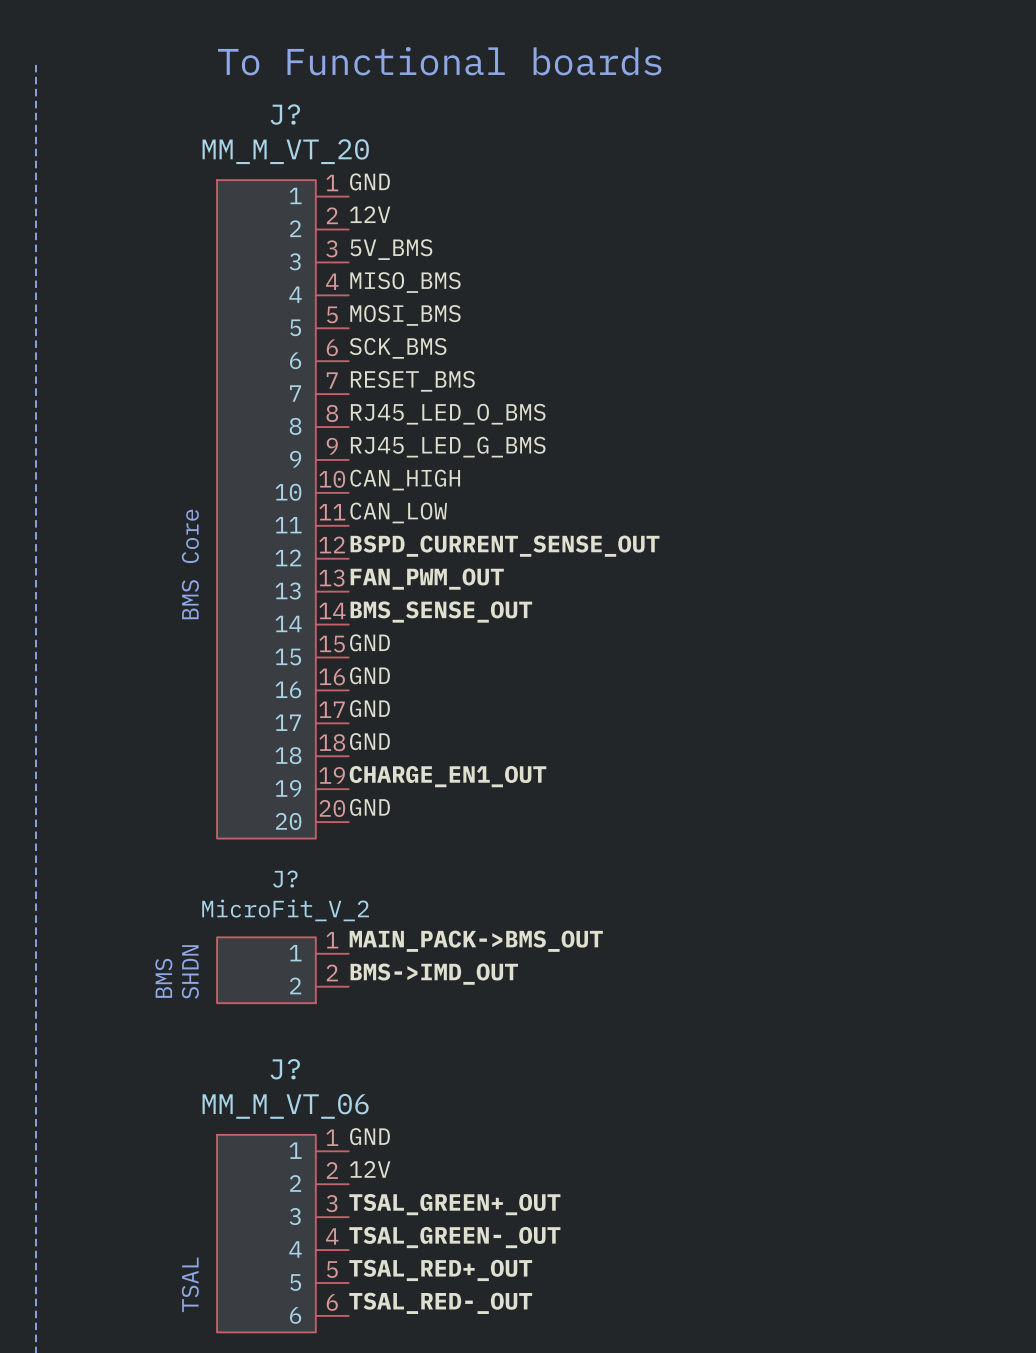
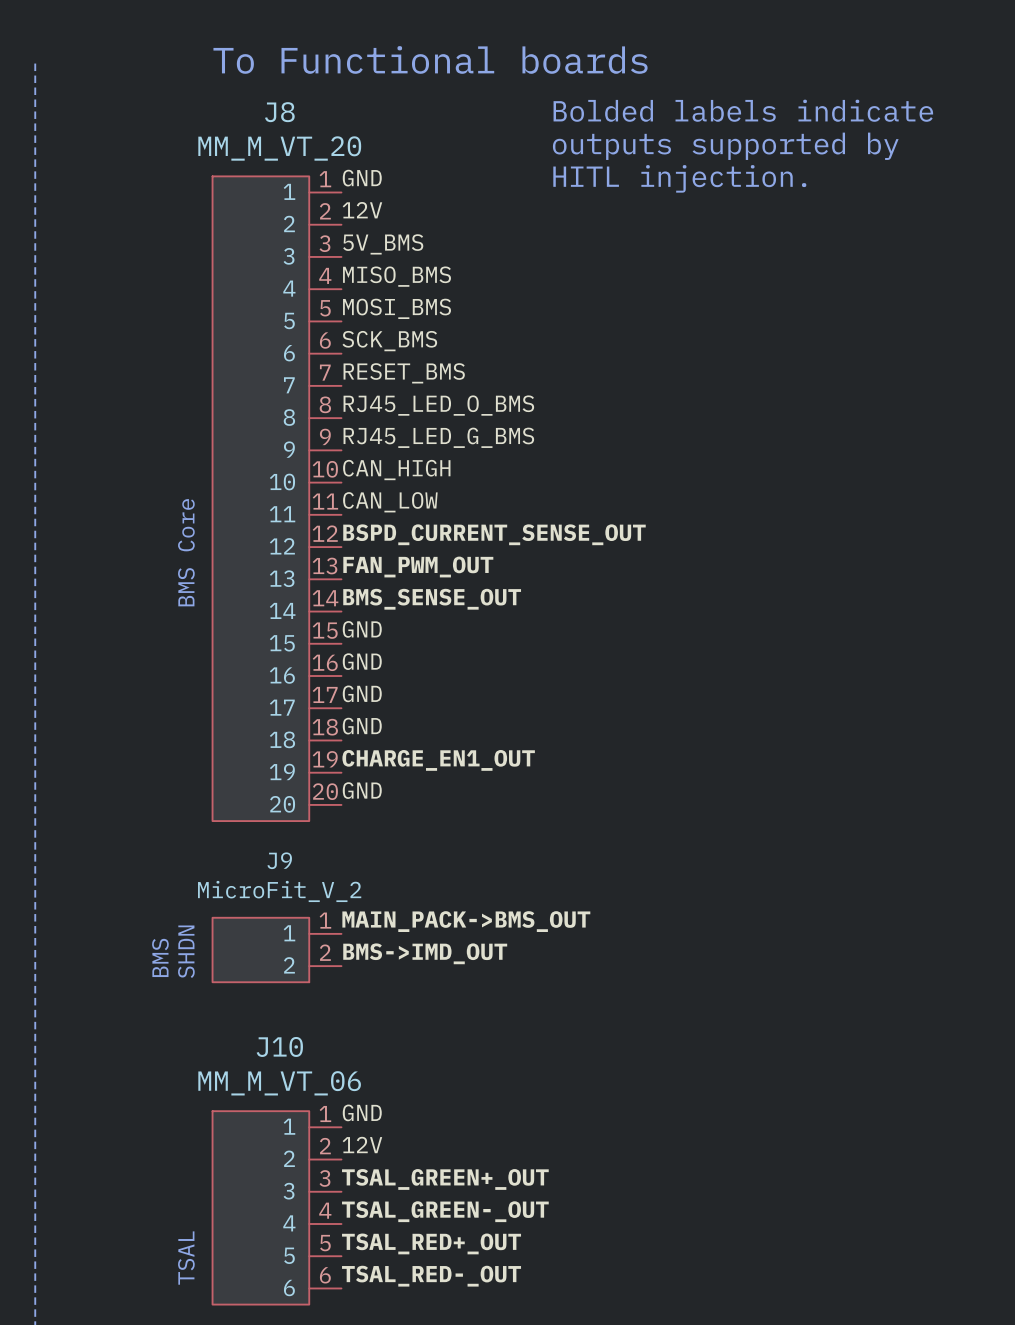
text: none -> Bolded labels indicate (743, 110)
J? name: J? (285, 114) -> J8 (279, 112)
text: none -> outputs supported by (725, 146)
text: none -> HITL injection. (679, 178)
J? name: J? (285, 879) -> J9 (279, 860)
J? name: J? (285, 1069) -> J10 (279, 1046)

